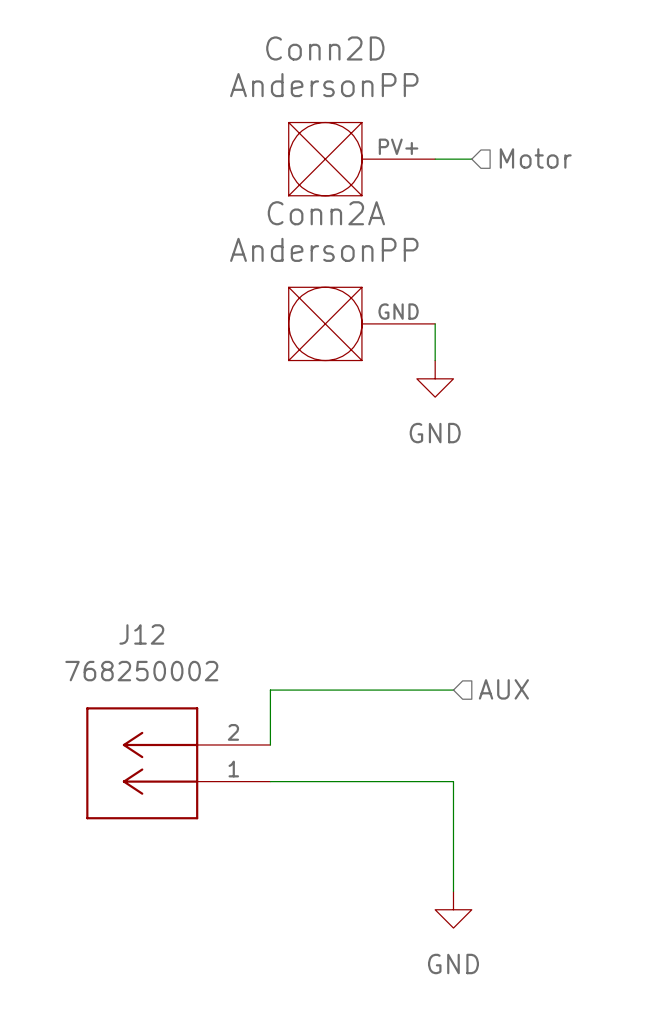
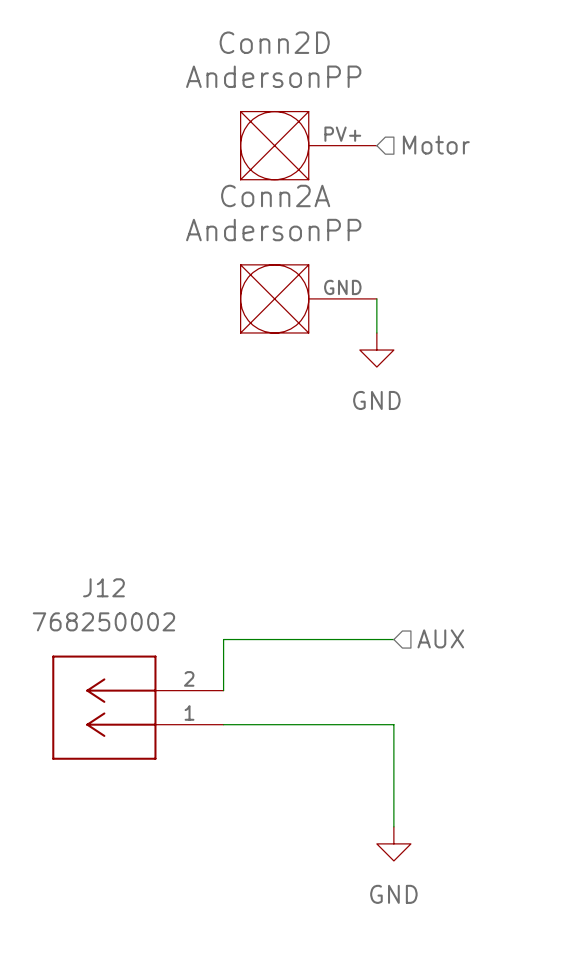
hierarchical label position: Motor (535, 158) -> Motor (436, 145)
wire: (435, 159) (471, 159) -> none

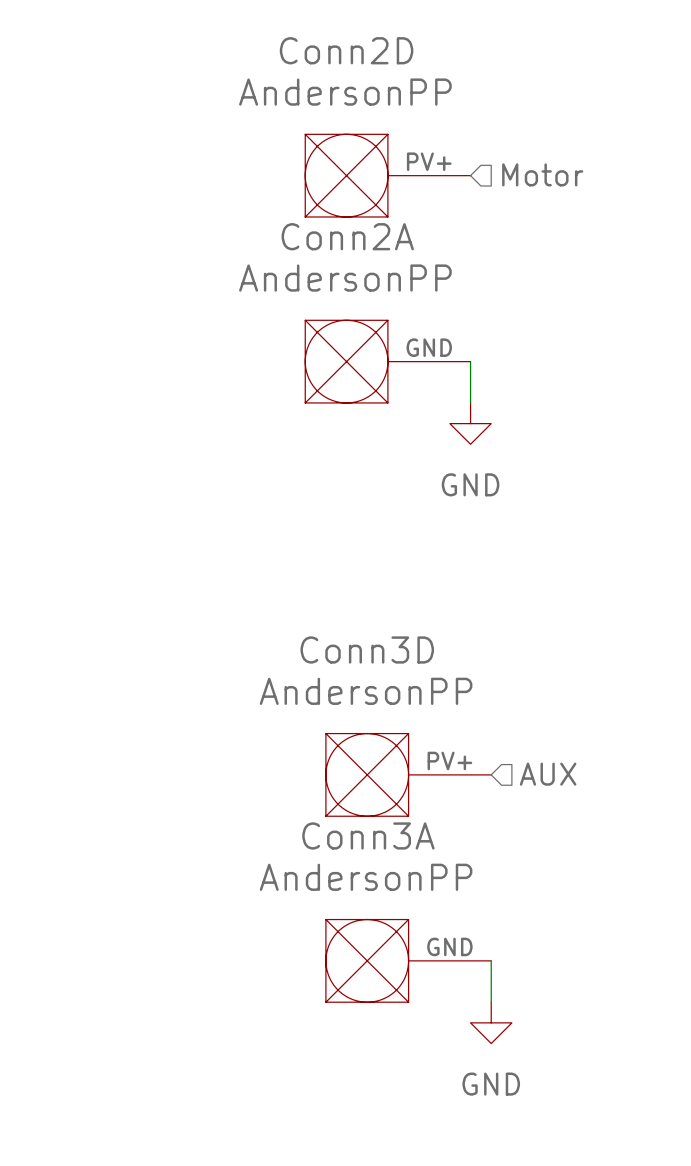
Conn3D: none -> AndersonPP (408, 774)
wire: (393, 639) (223, 639) (223, 690) -> none
J12: 768250002 (137, 707) -> none
wire: (223, 724) (393, 724) (393, 792) -> none
Conn3A: none -> AndersonPP (408, 960)

